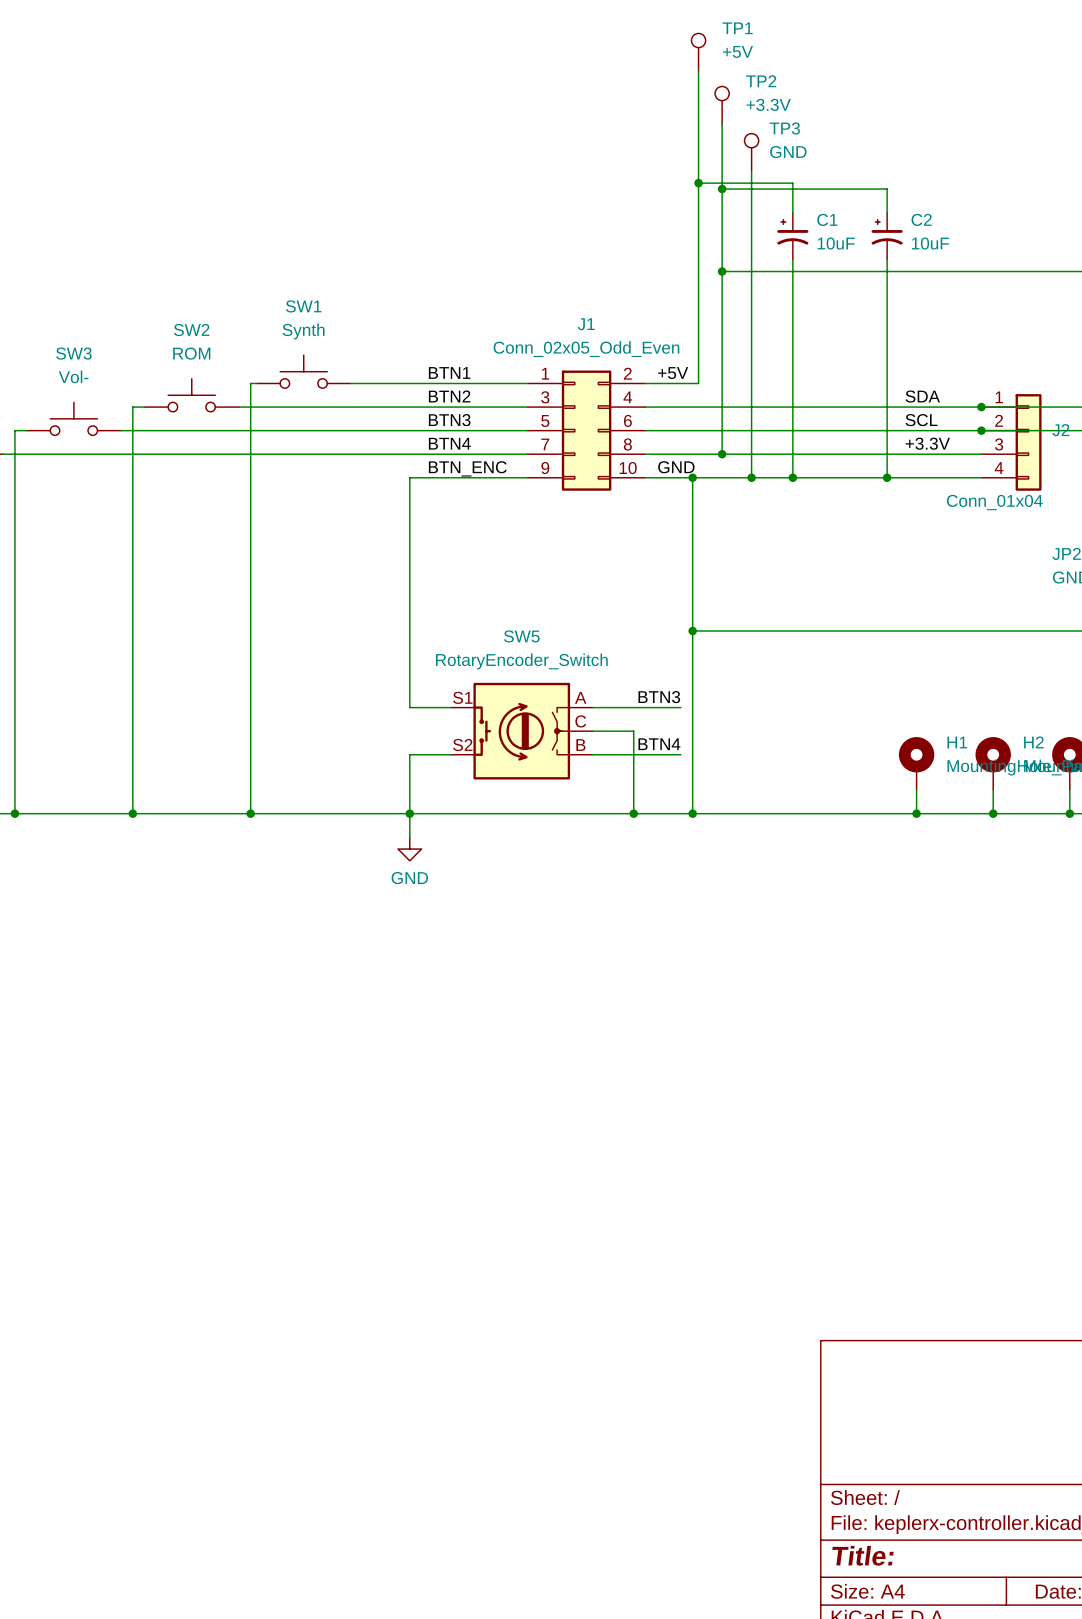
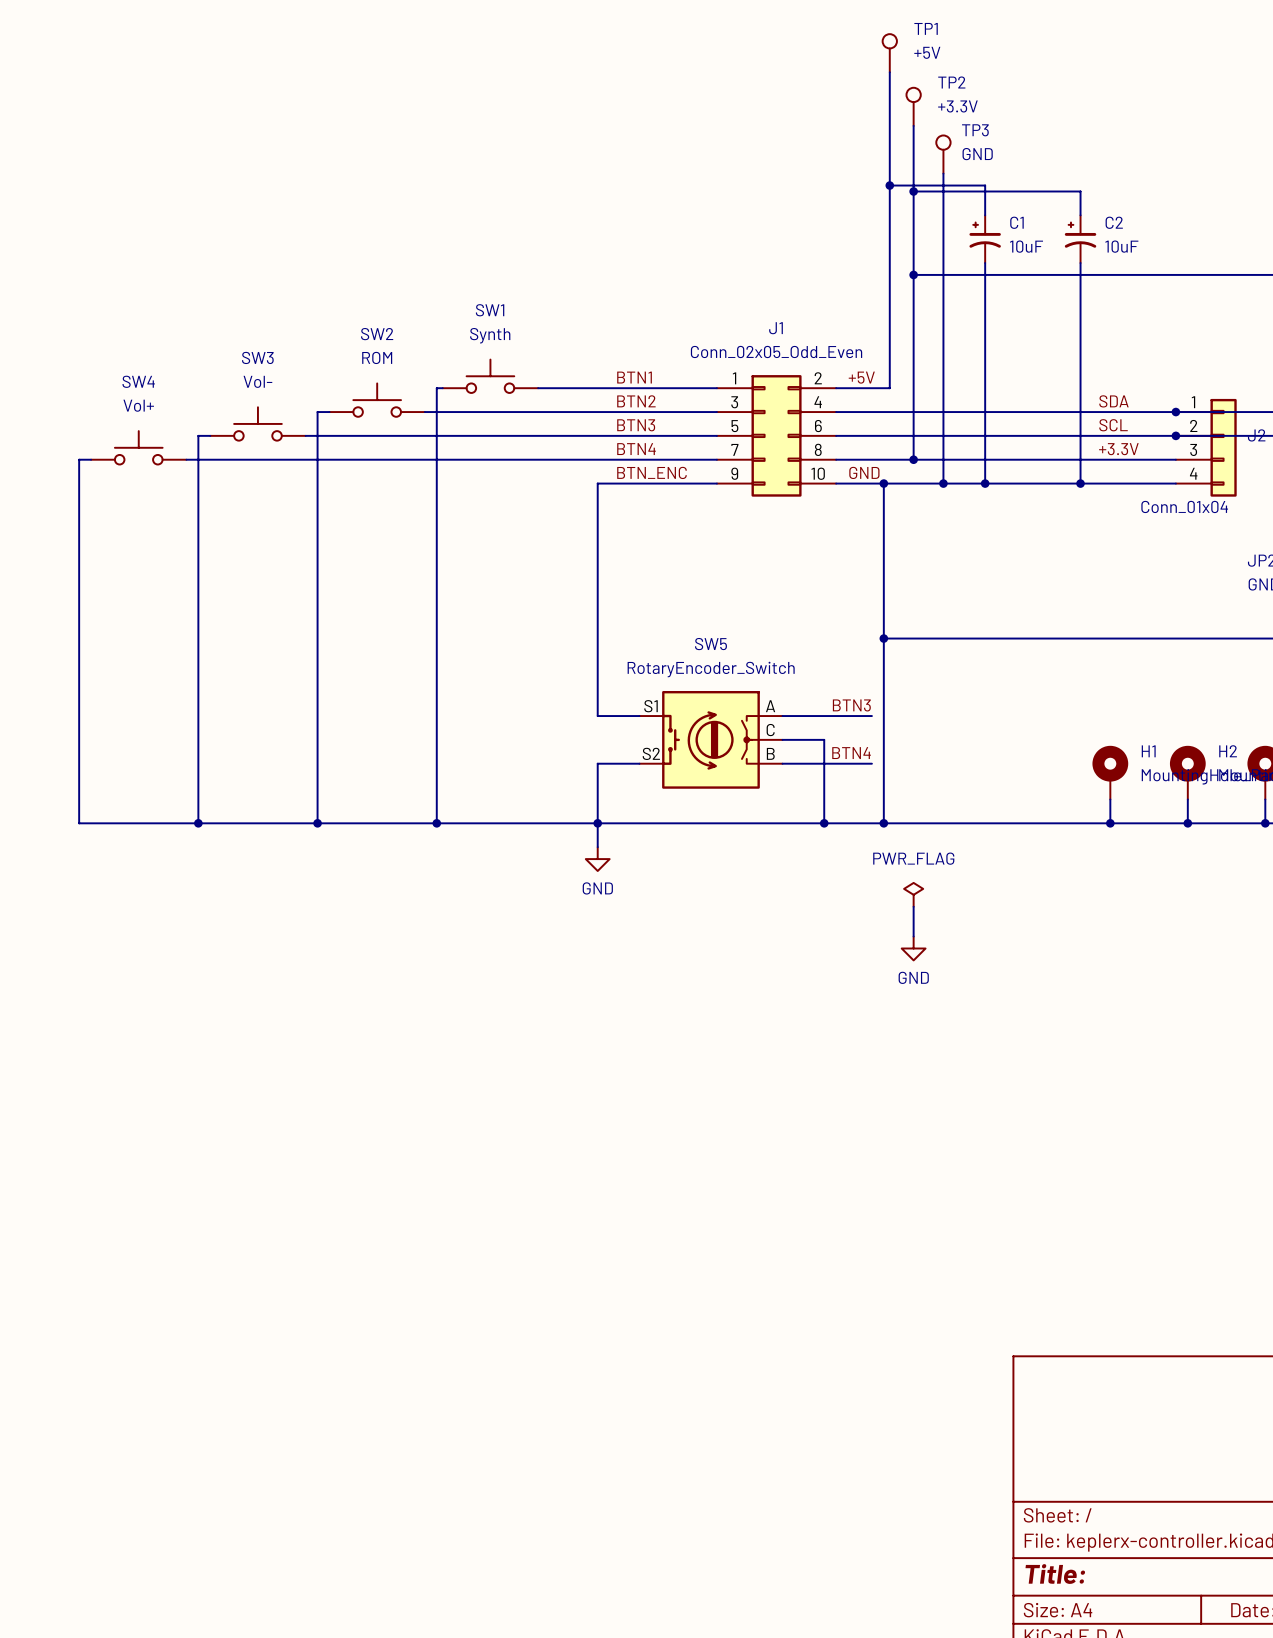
power symbol: none -> PWR_FLAG (913, 894)
wire: none -> (913, 906) (913, 936)
power symbol: none -> GND (913, 948)

